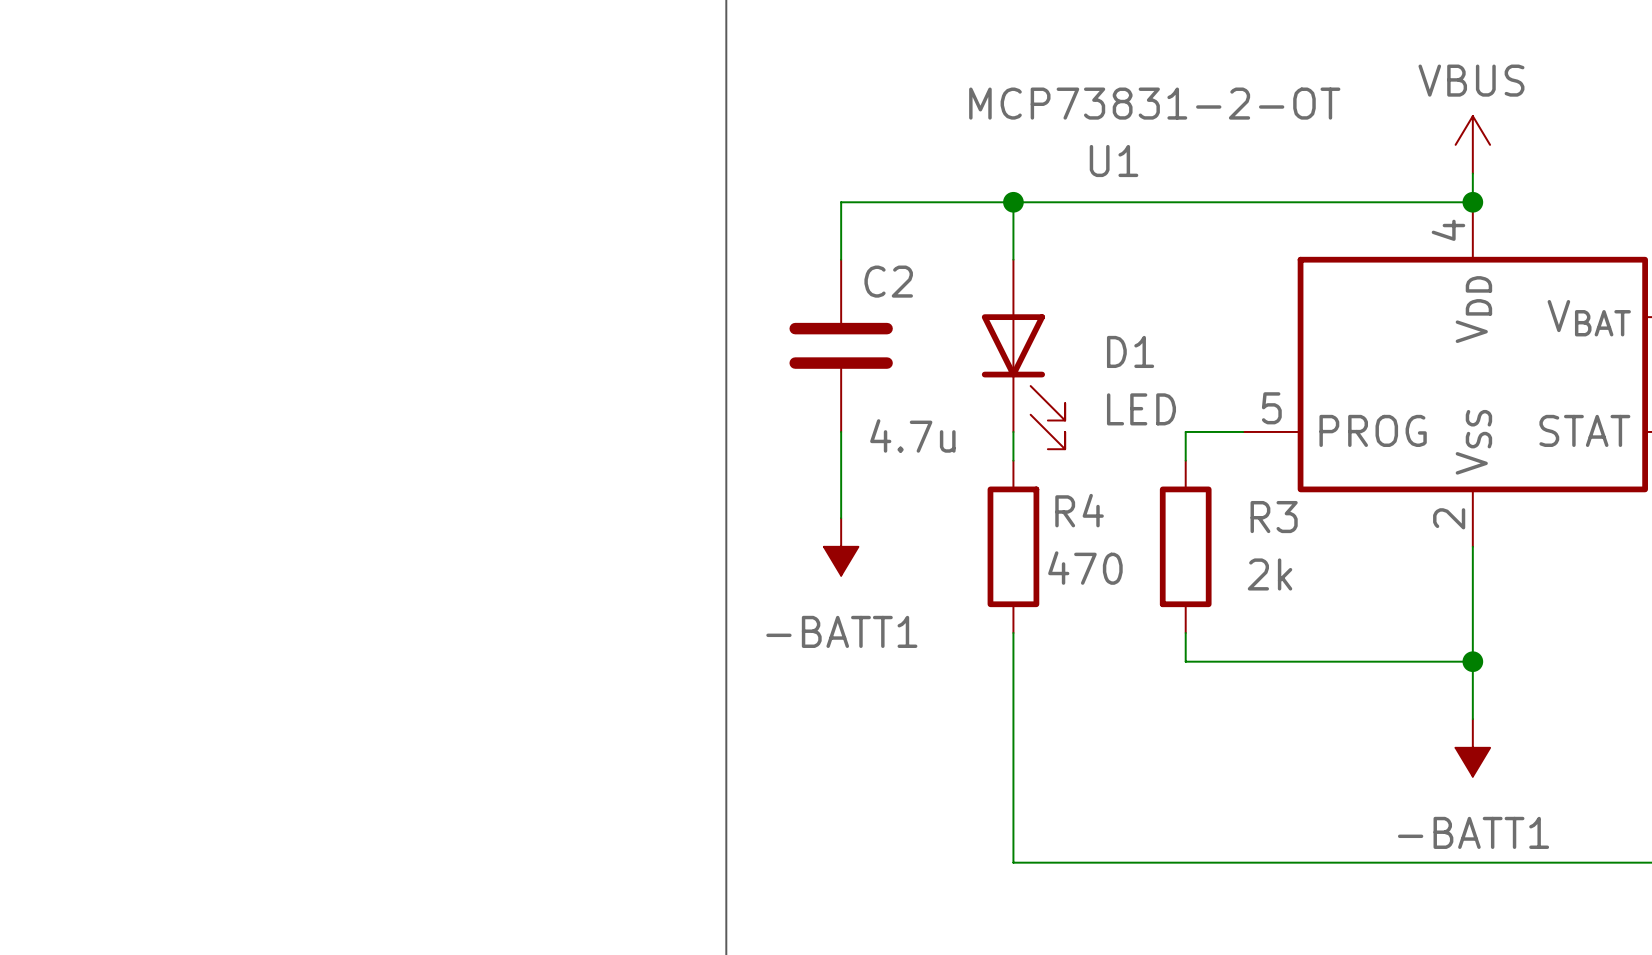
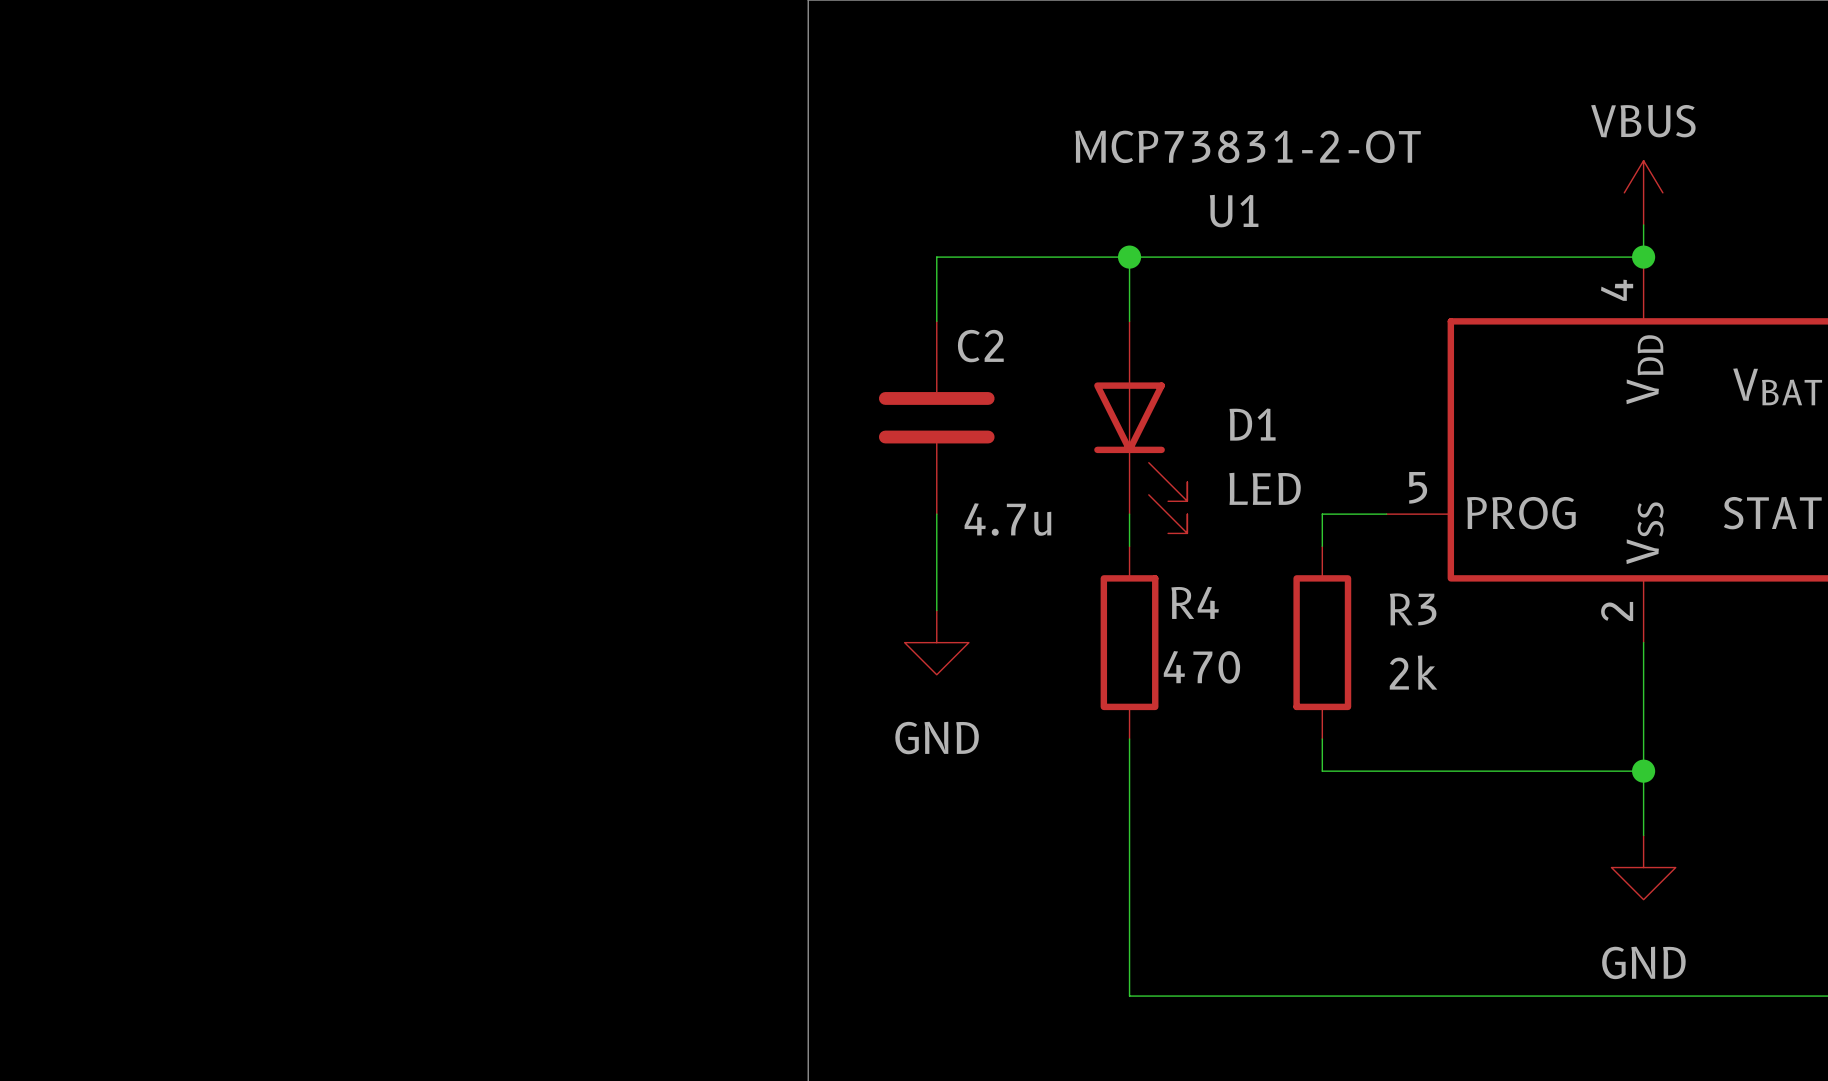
power symbol: -BATT1 (841, 546) -> GND (936, 642)
power symbol: -BATT1 (1472, 747) -> GND (1643, 867)

